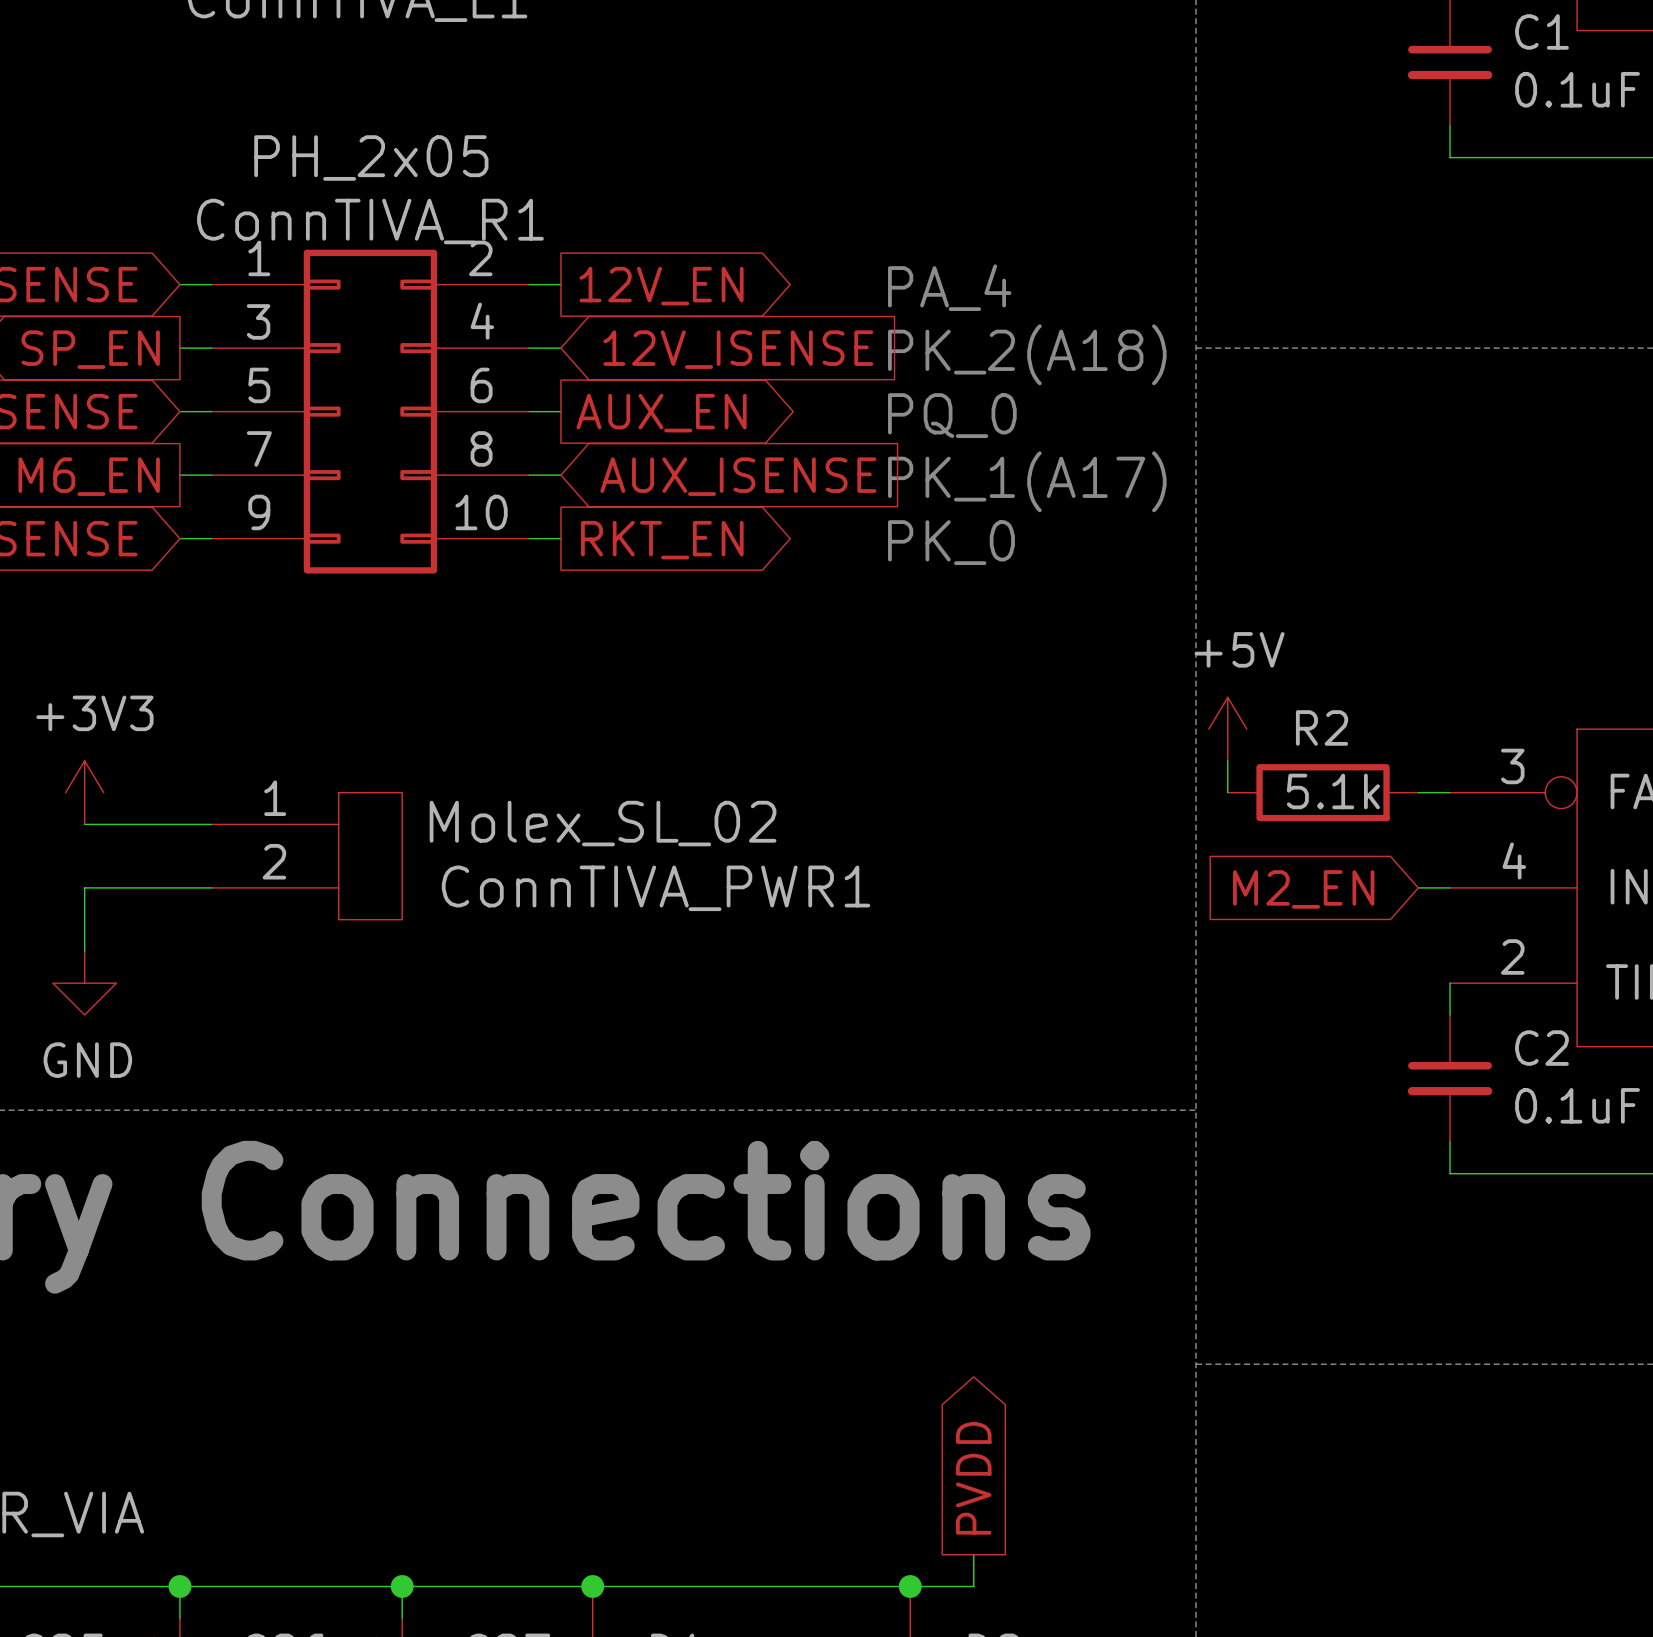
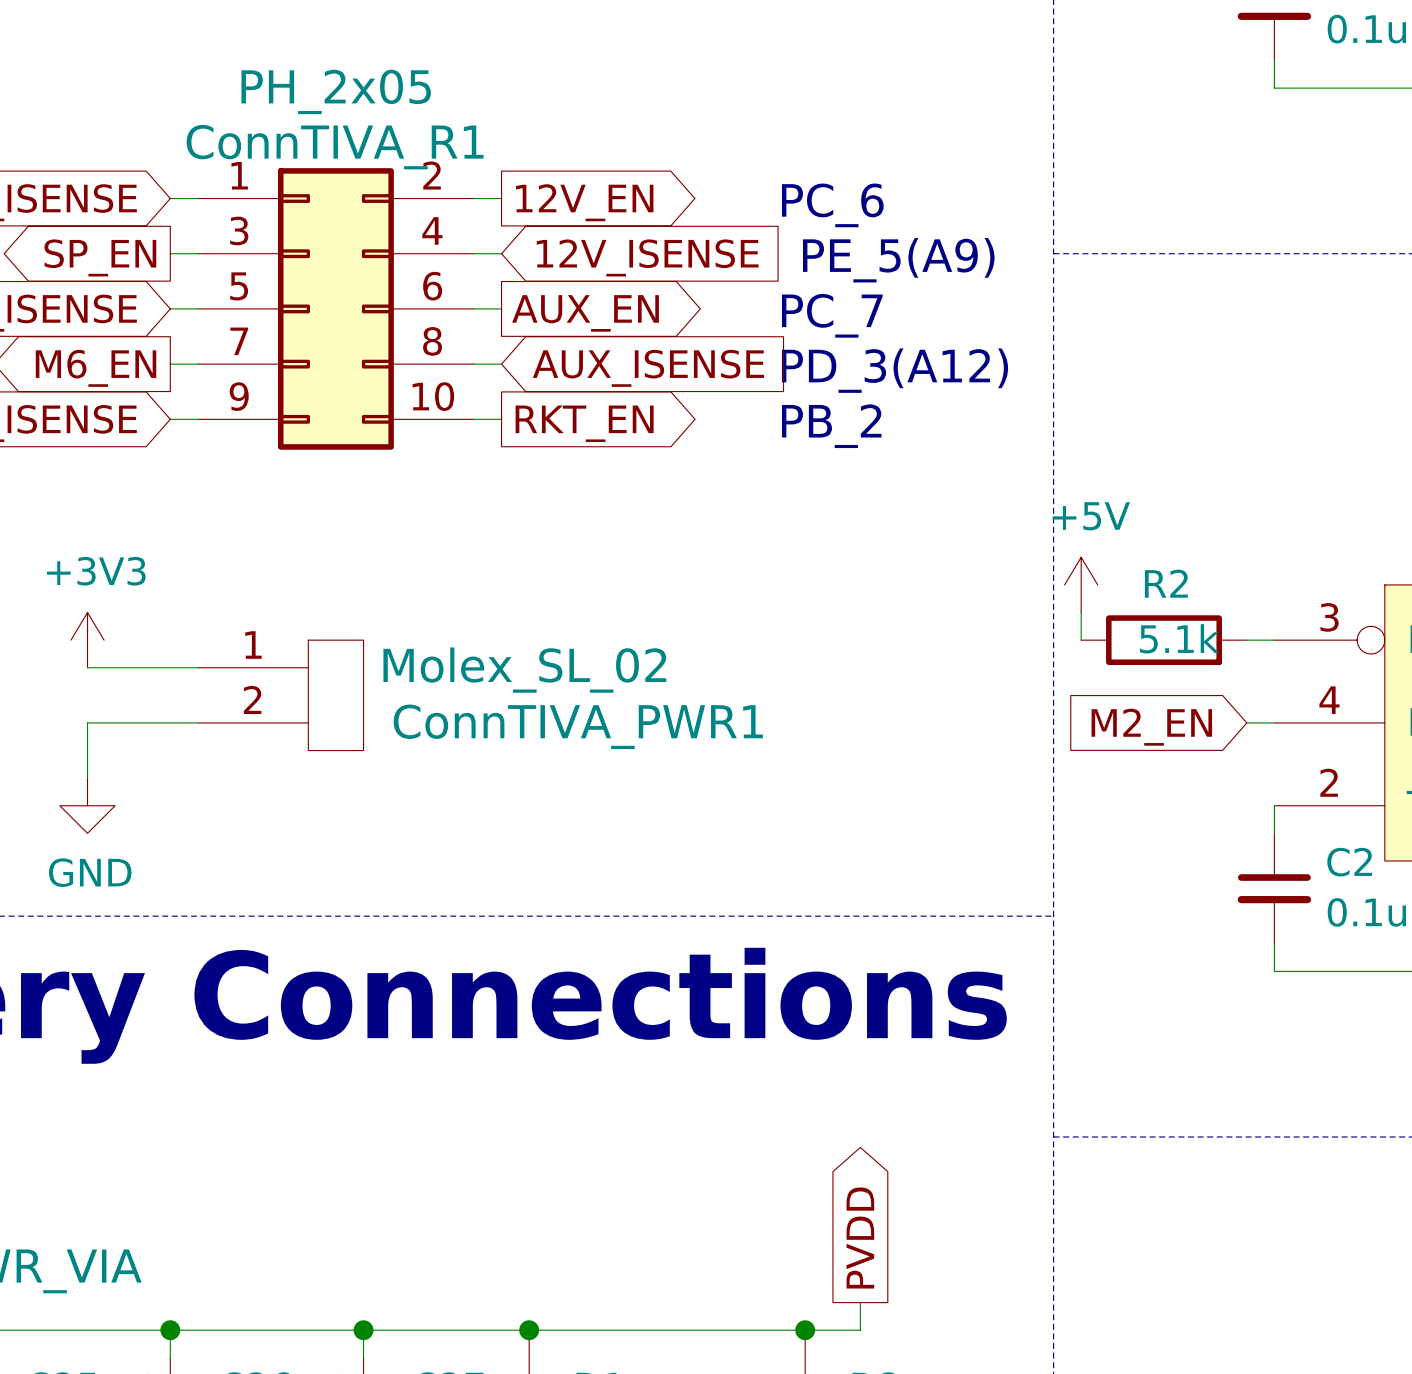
text: PA_4 (949, 287) -> PC_6 (832, 205)
text: none -> PE_5(A9) (898, 260)
text: PK_2(A18) (1027, 354) -> none
text: PQ_0 (952, 415) -> PC_7 (832, 315)
text: PK_1(A17) (1027, 481) -> PD_3(A12) (895, 370)
text: PK_0 (951, 542) -> PB_2 (831, 426)

